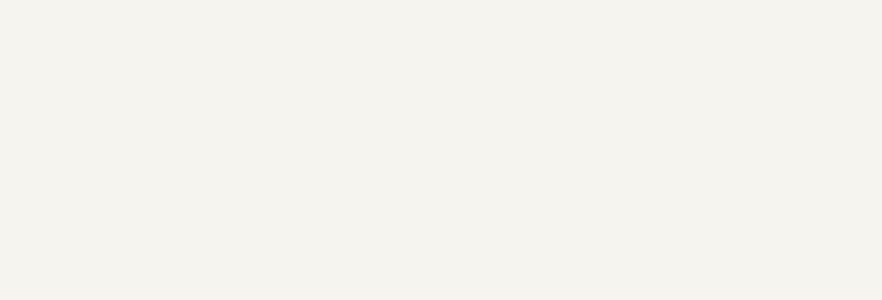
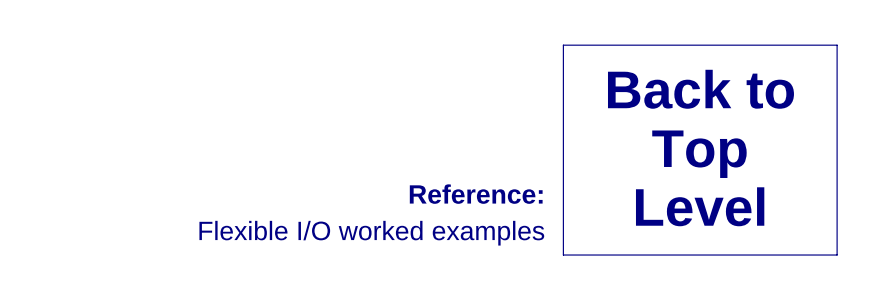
line: none -> (563, 45) (837, 45) (837, 255) (563, 255) (563, 45)
text: none -> Back to (700, 89)
text: none -> Top (699, 154)
text: none -> Reference: (476, 194)
text: none -> Level (700, 206)
text: none -> Flexible I/O worked examples (371, 233)

